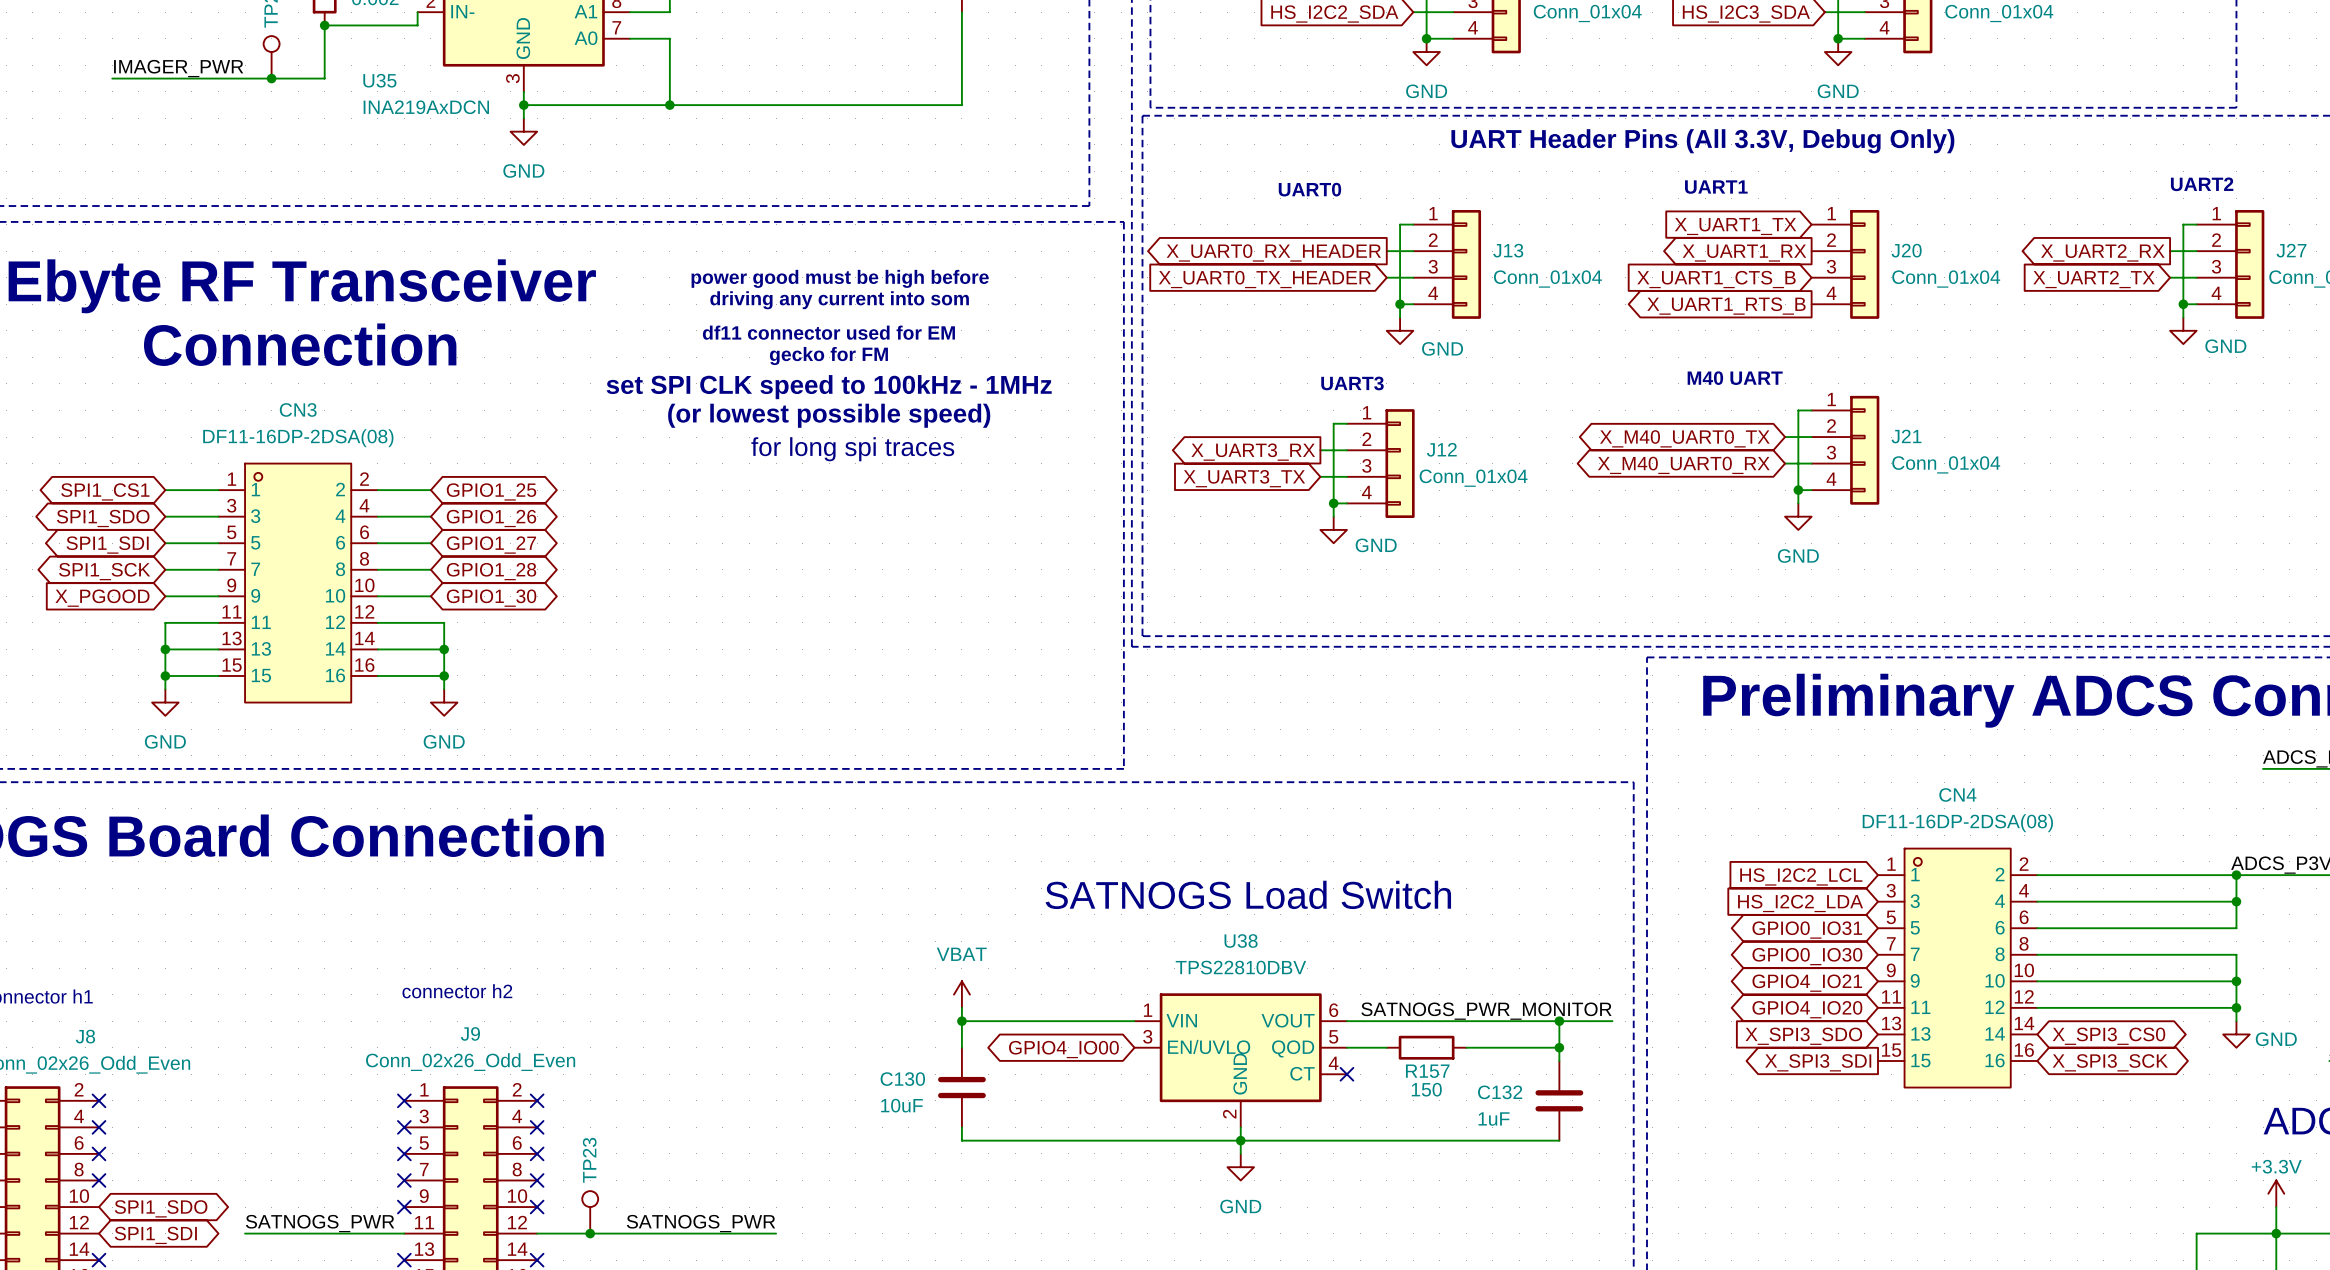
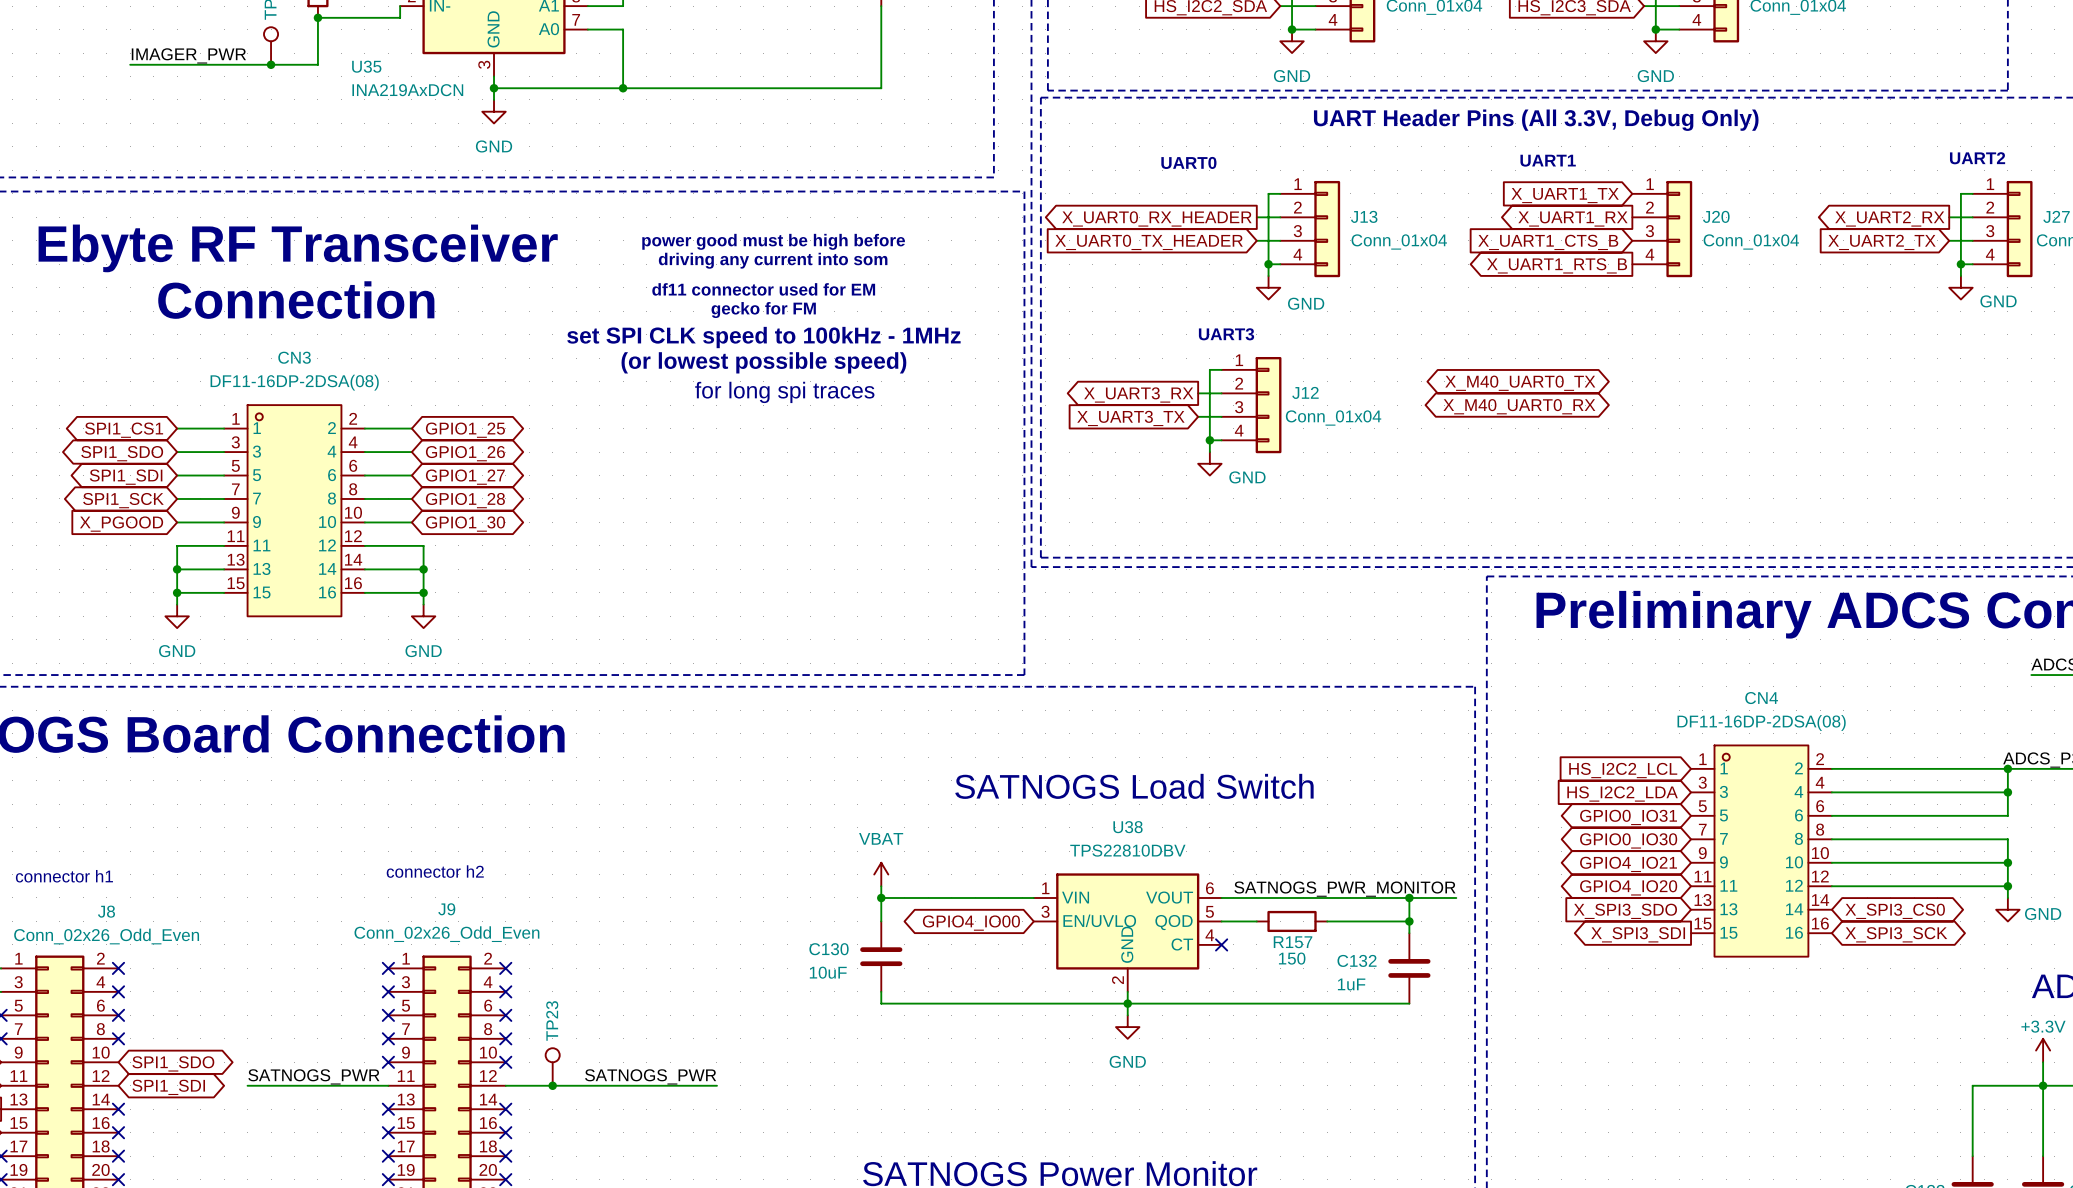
text: M40 UART (1735, 378) -> none
wire: (1811, 410) (1798, 410) (1798, 503) -> none
wire: (1785, 437) (1811, 437) -> none
J21: Conn_01x04 (1845, 450) -> none
wire: (1785, 463) (1811, 463) -> none
wire: (1798, 490) (1811, 490) -> none
junction: (1798, 490) -> none
power symbol: GND (1798, 516) -> none

